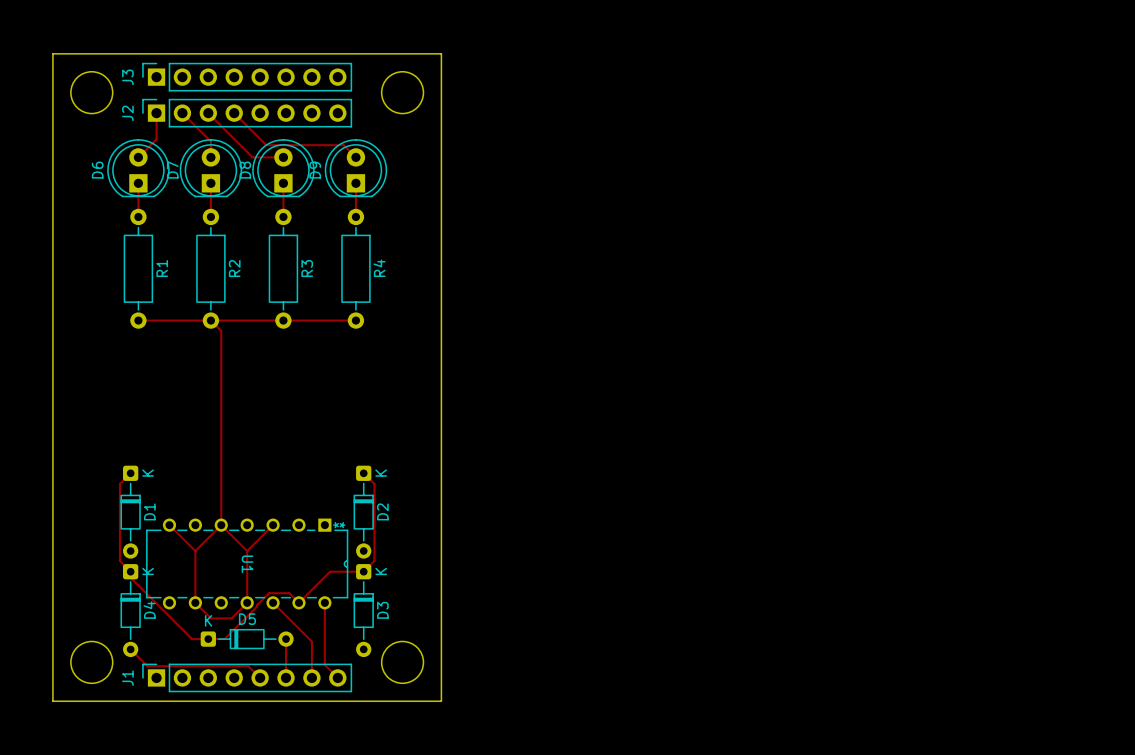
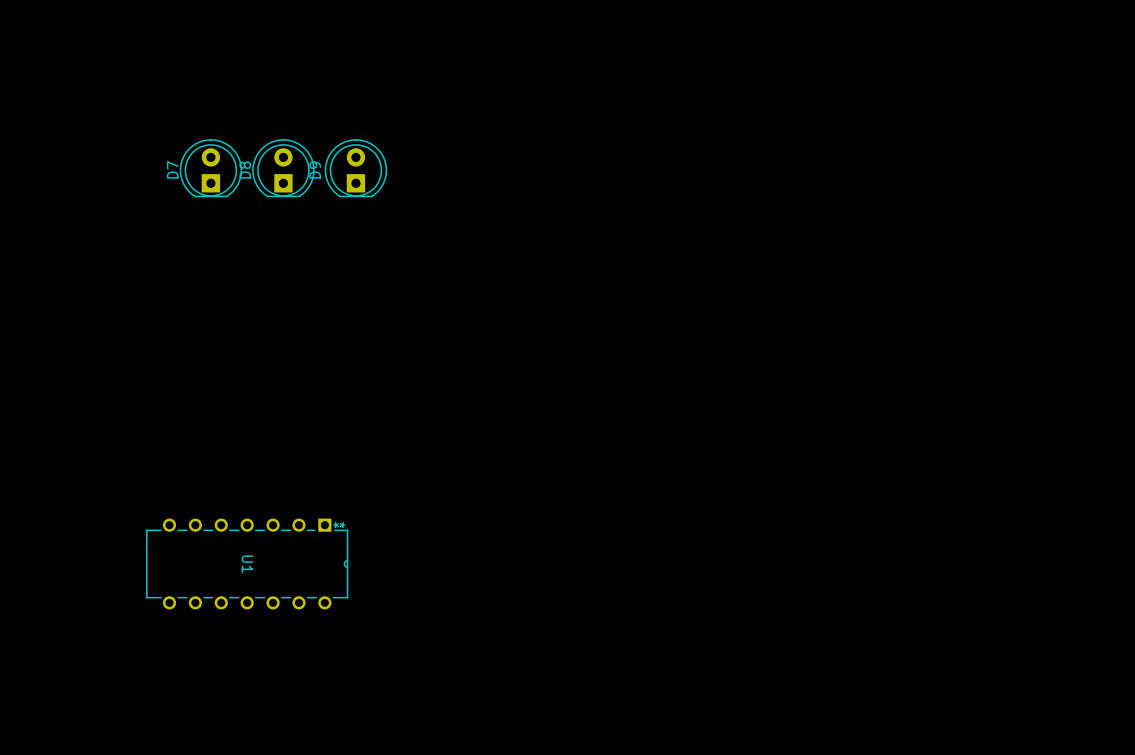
board edge: (52, 53) (441, 53) (441, 701) (52, 701) (52, 53) -> none
round board edge: [70, 71, 113, 114] -> none
round board edge: [381, 71, 424, 114] -> none
J3: (247, 77) -> none
track: (156, 113) (156, 139) (138, 157) -> none
track: (182, 113) (210, 141) (210, 157) -> none
track: (208, 113) (252, 157) (283, 157) -> none
track: (234, 113) (266, 145) (343, 145) (355, 157) -> none
J2: (247, 113) -> none
D6: (138, 168) -> none
track: (138, 183) (138, 216) -> none
track: (210, 183) (210, 216) -> none
track: (283, 183) (283, 216) -> none
track: (355, 183) (355, 216) -> none
R1: (138, 268) -> none
R2: (210, 268) -> none
R3: (283, 268) -> none
R4: (355, 268) -> none
track: (138, 320) (355, 320) -> none
track: (210, 320) (221, 330) (221, 525) -> none
track: (130, 473) (119, 484) (119, 560) (130, 571) (130, 577) (192, 639) (224, 639) (269, 593) (289, 593) (298, 602) (330, 571) (363, 571) (374, 560) (374, 484) (363, 473) -> none
D1: (130, 512) -> none
D2: (363, 512) -> none
track: (169, 525) (195, 551) -> none
track: (221, 525) (247, 551) -> none
track: (221, 525) (195, 551) -> none
track: (273, 525) (247, 551) -> none
track: (195, 551) (195, 602) (210, 618) (231, 618) (247, 602) (247, 551) -> none
track: (273, 602) (311, 641) (311, 677) -> none
track: (324, 602) (324, 664) (337, 677) -> none
D4: (130, 610) -> none
D3: (363, 610) -> none
D5: (247, 639) -> none
track: (286, 639) (286, 677) -> none
round board edge: [70, 641, 113, 684] -> none
round board edge: [381, 641, 424, 684] -> none
track: (130, 649) (147, 666) (248, 666) (260, 677) -> none
J1: (247, 677) -> none

